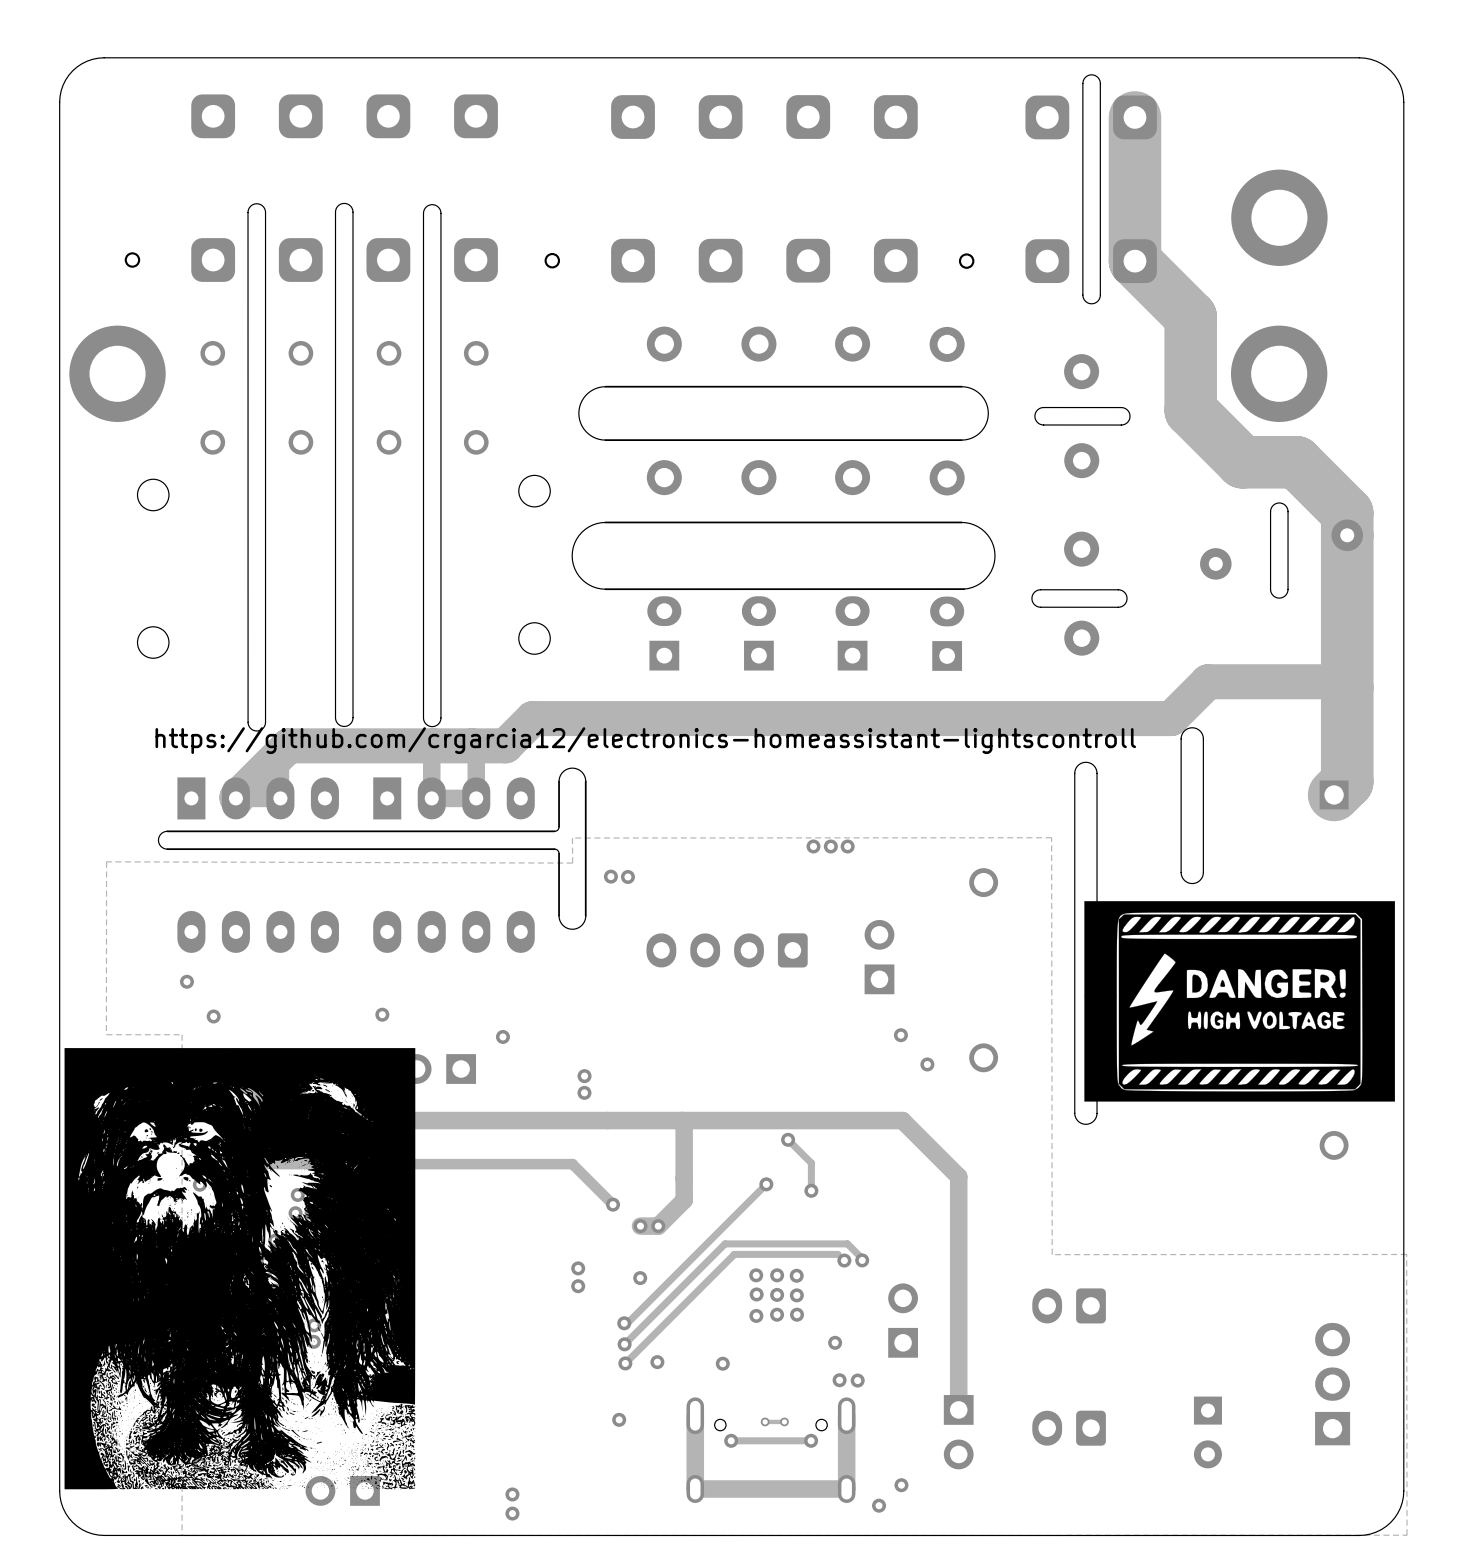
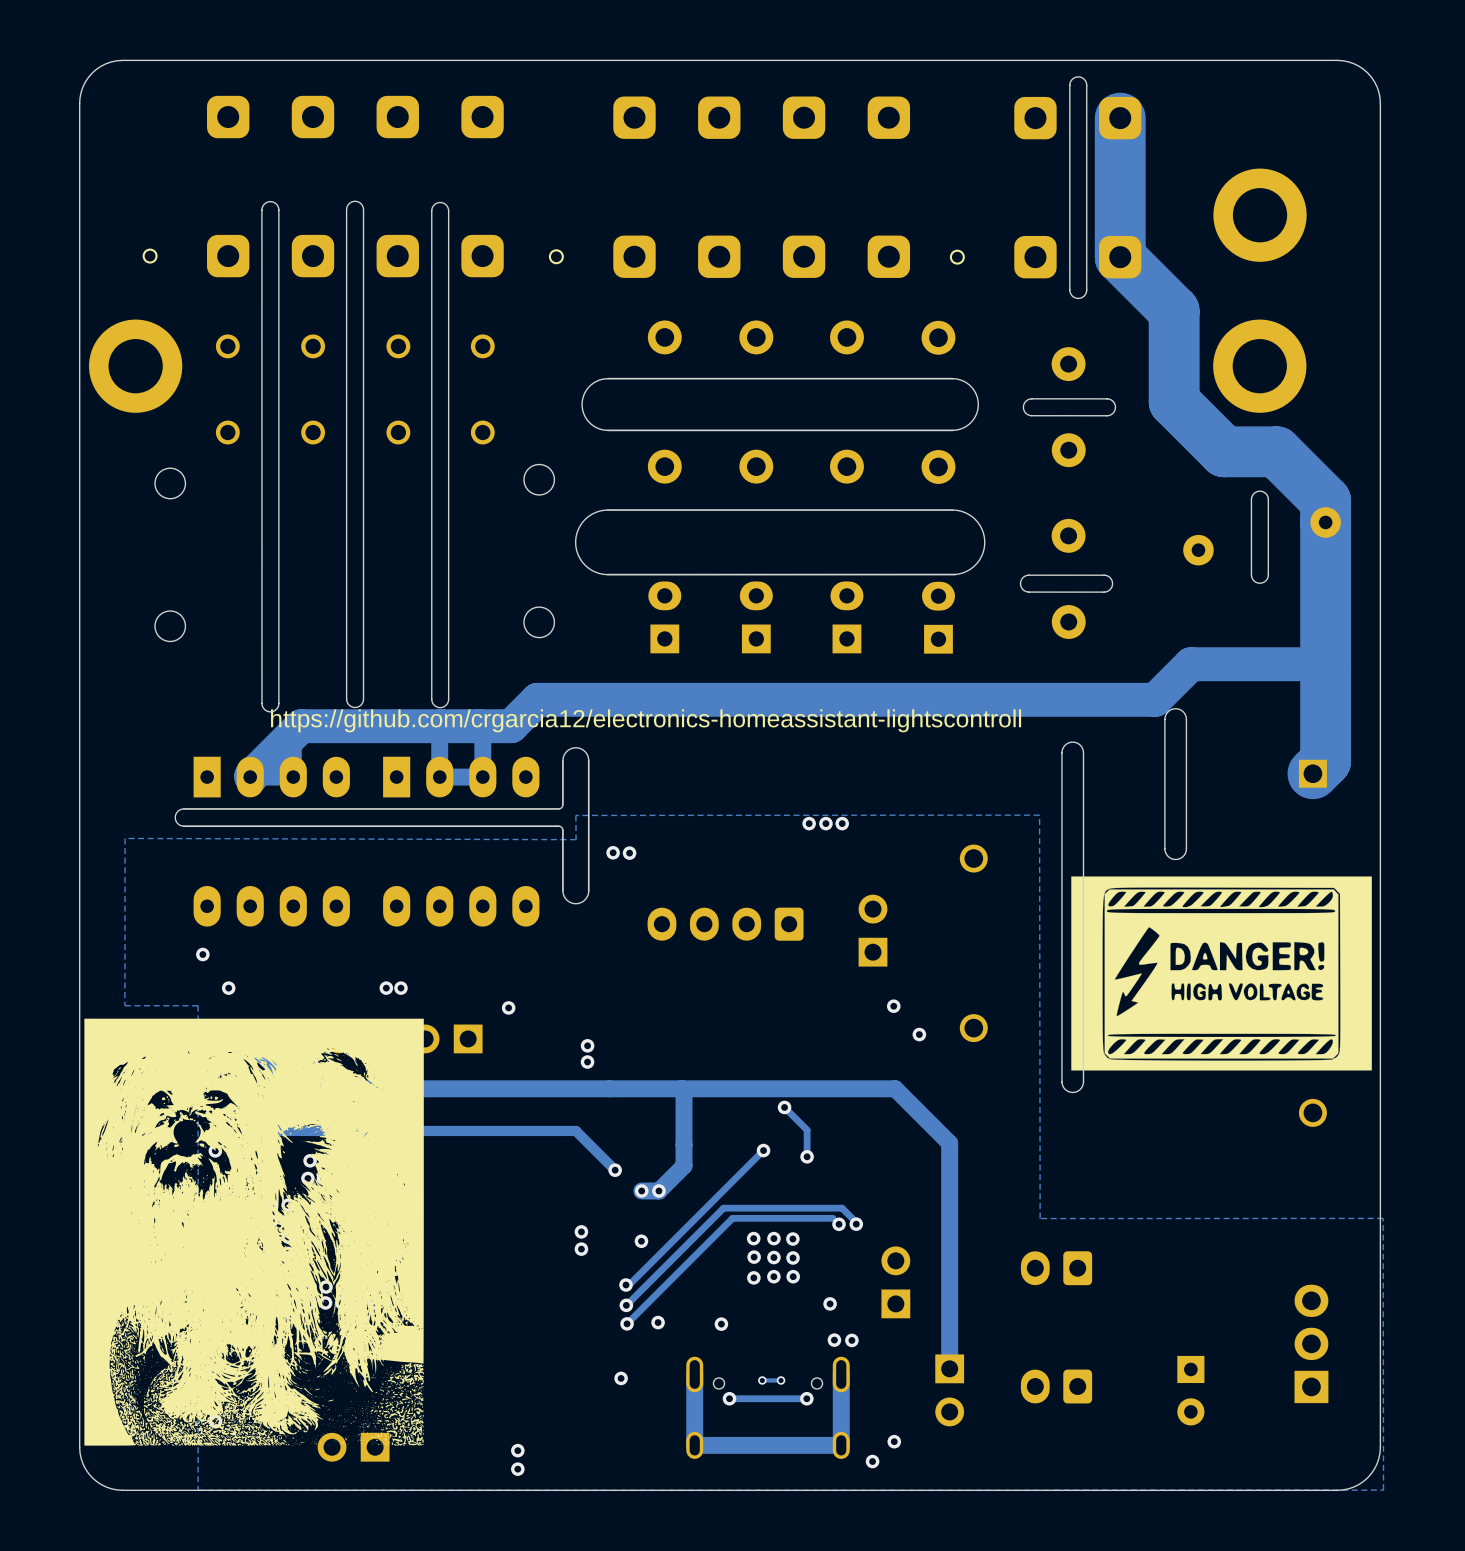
via: (382, 1014) -> none
via: none -> (386, 988)
via: none -> (400, 988)

